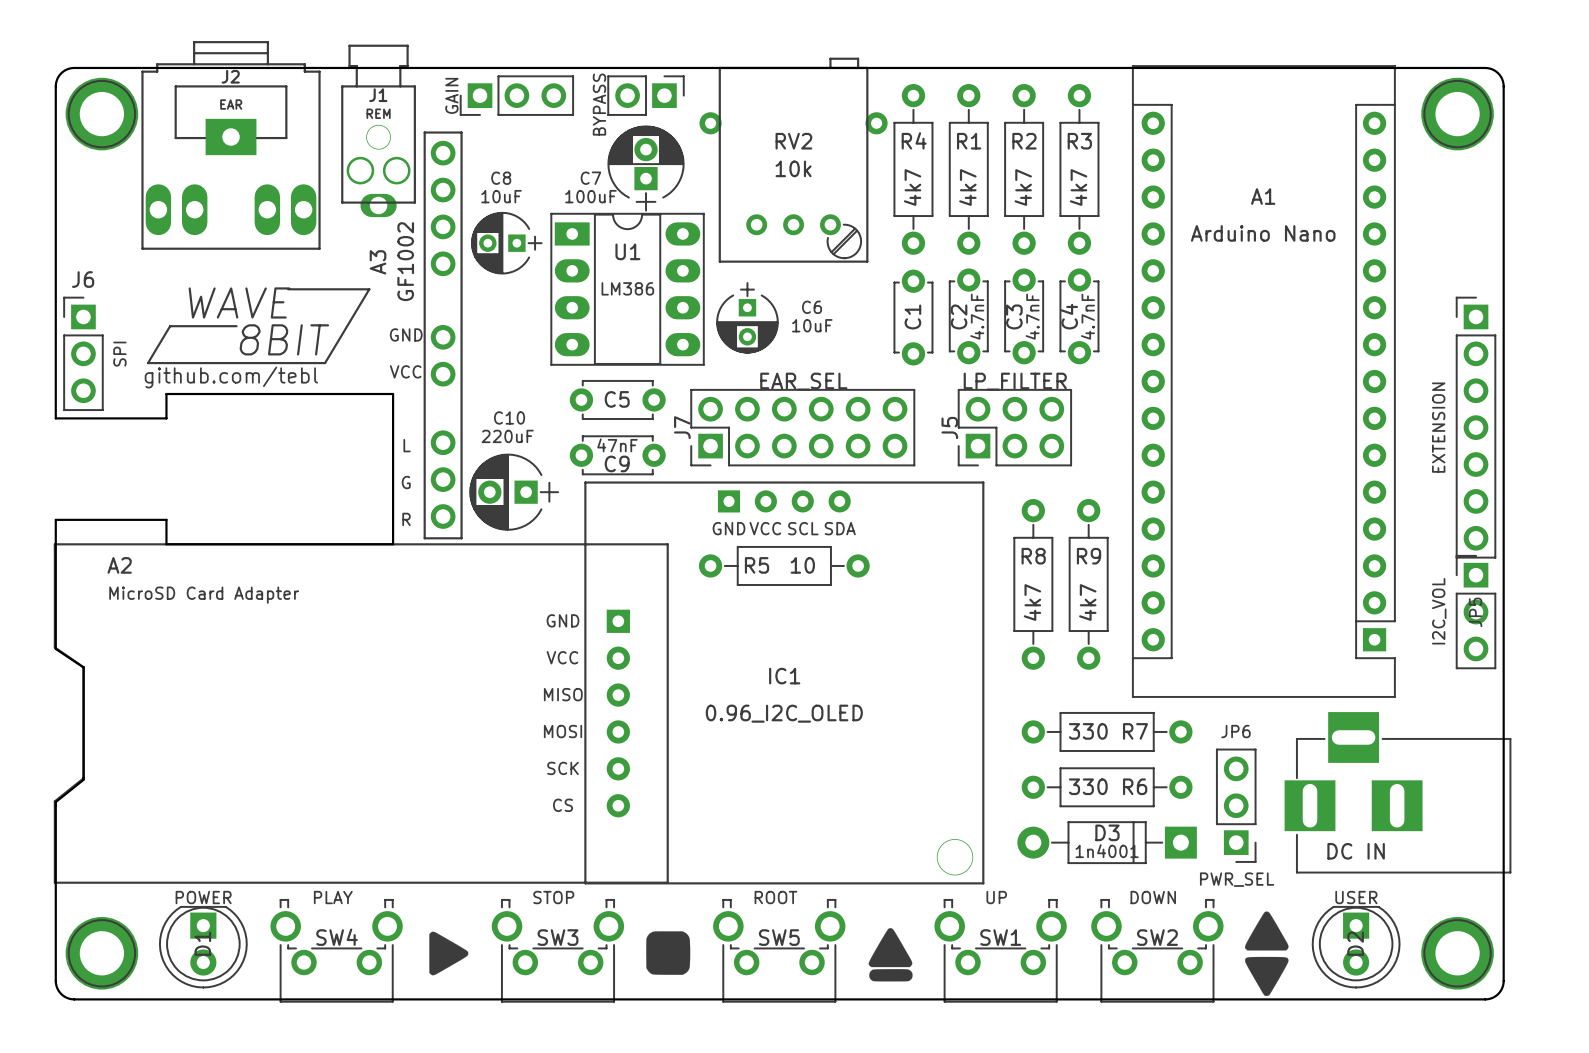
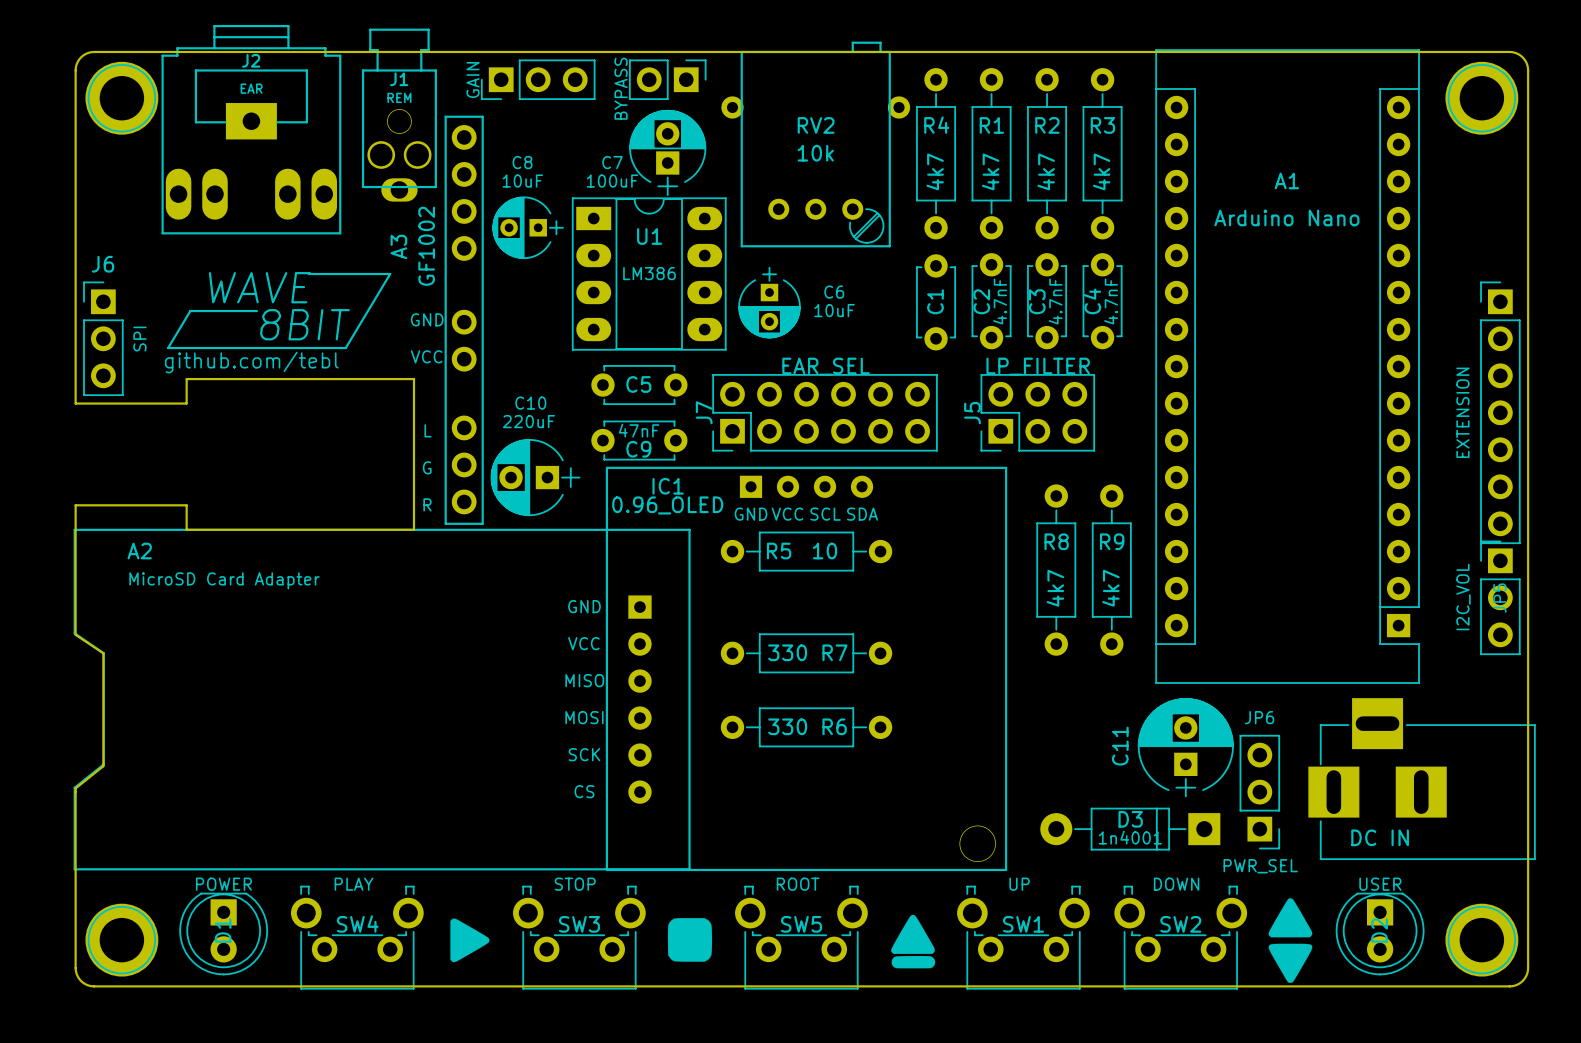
IC1 name position: IC1 (784, 676) -> IC1 (668, 486)
IC1 value: 0.96_I2C_OLED (784, 713) -> 0.96_OLED (667, 505)
R7 position: (1107, 731) -> (806, 653)
C11: none -> (1185, 747)
R6 position: (1107, 787) -> (806, 727)

